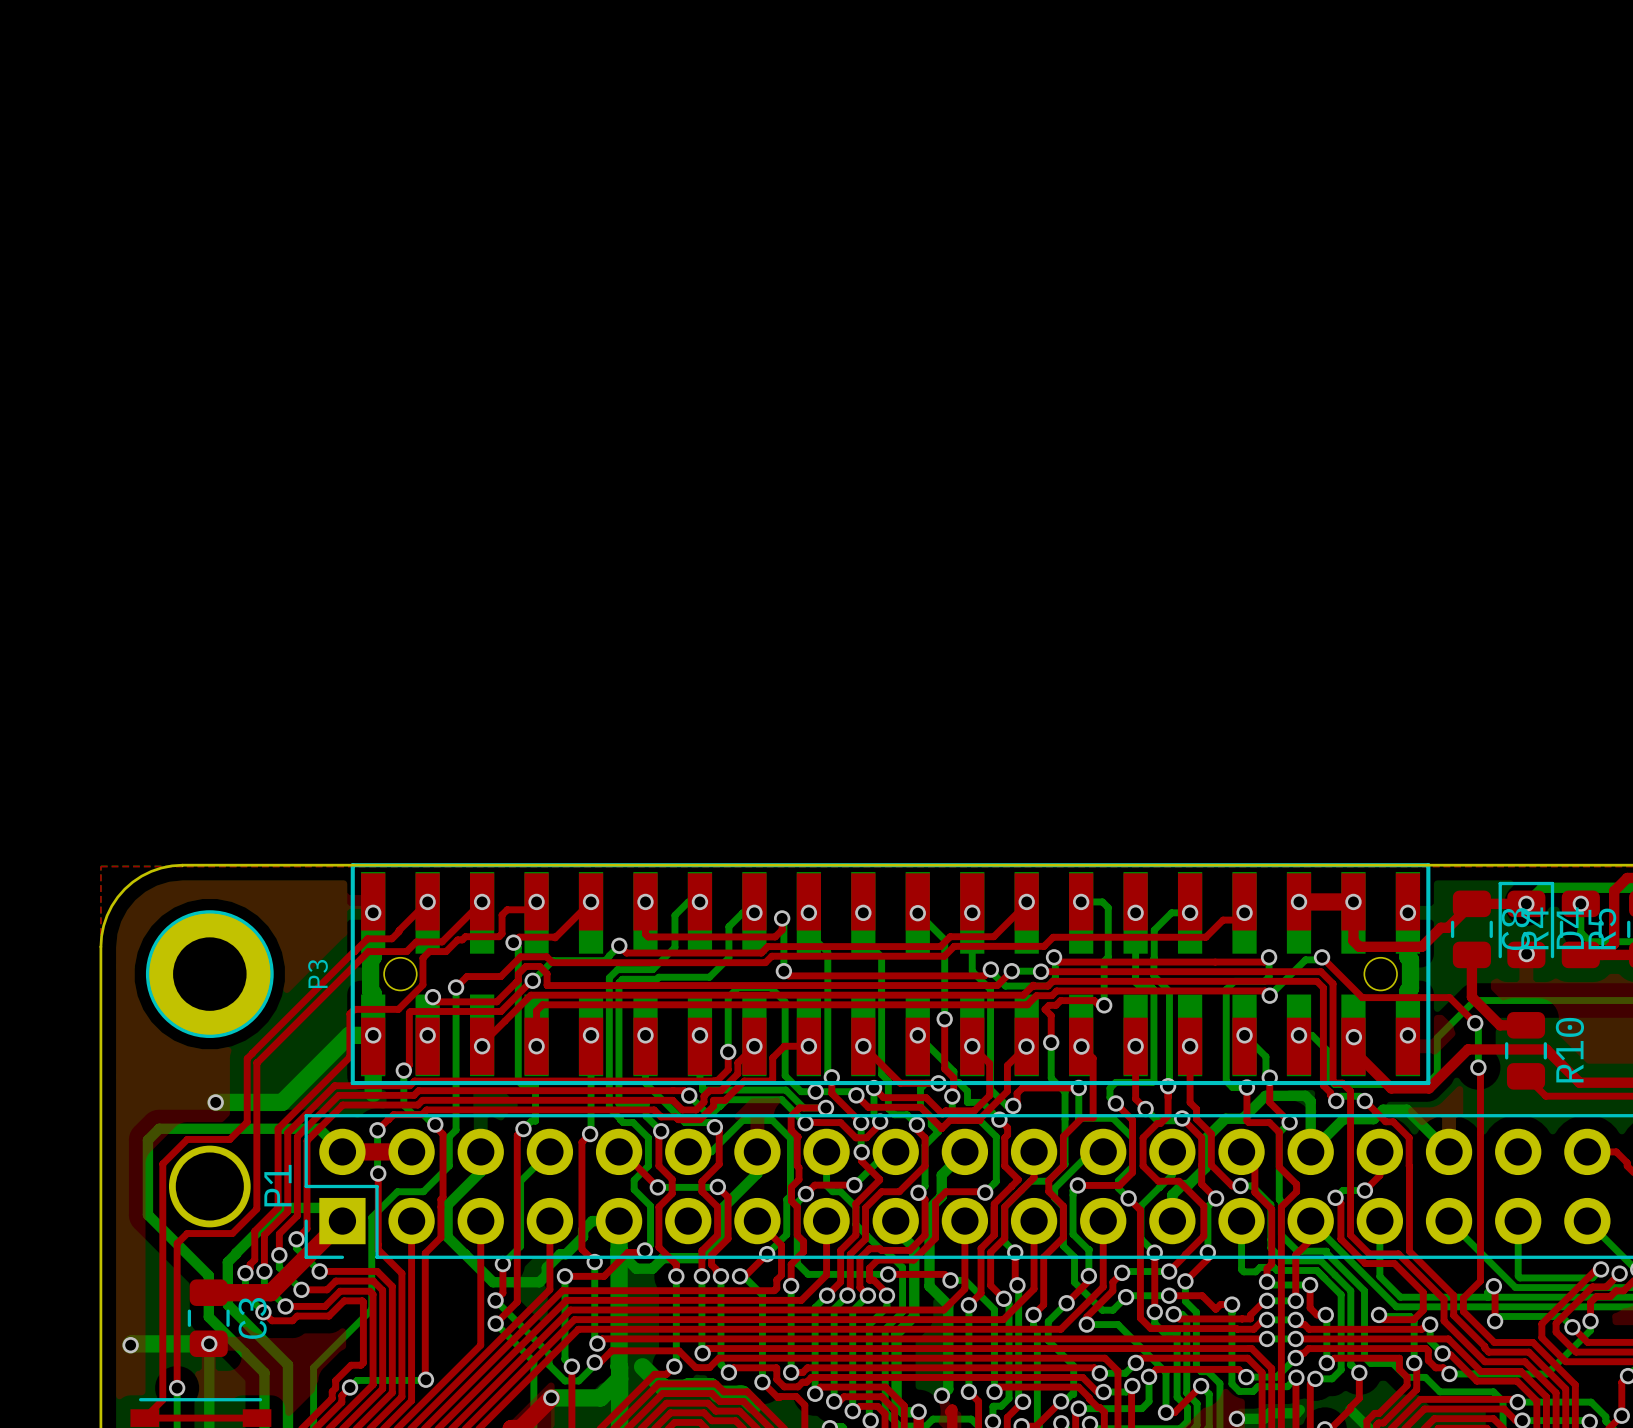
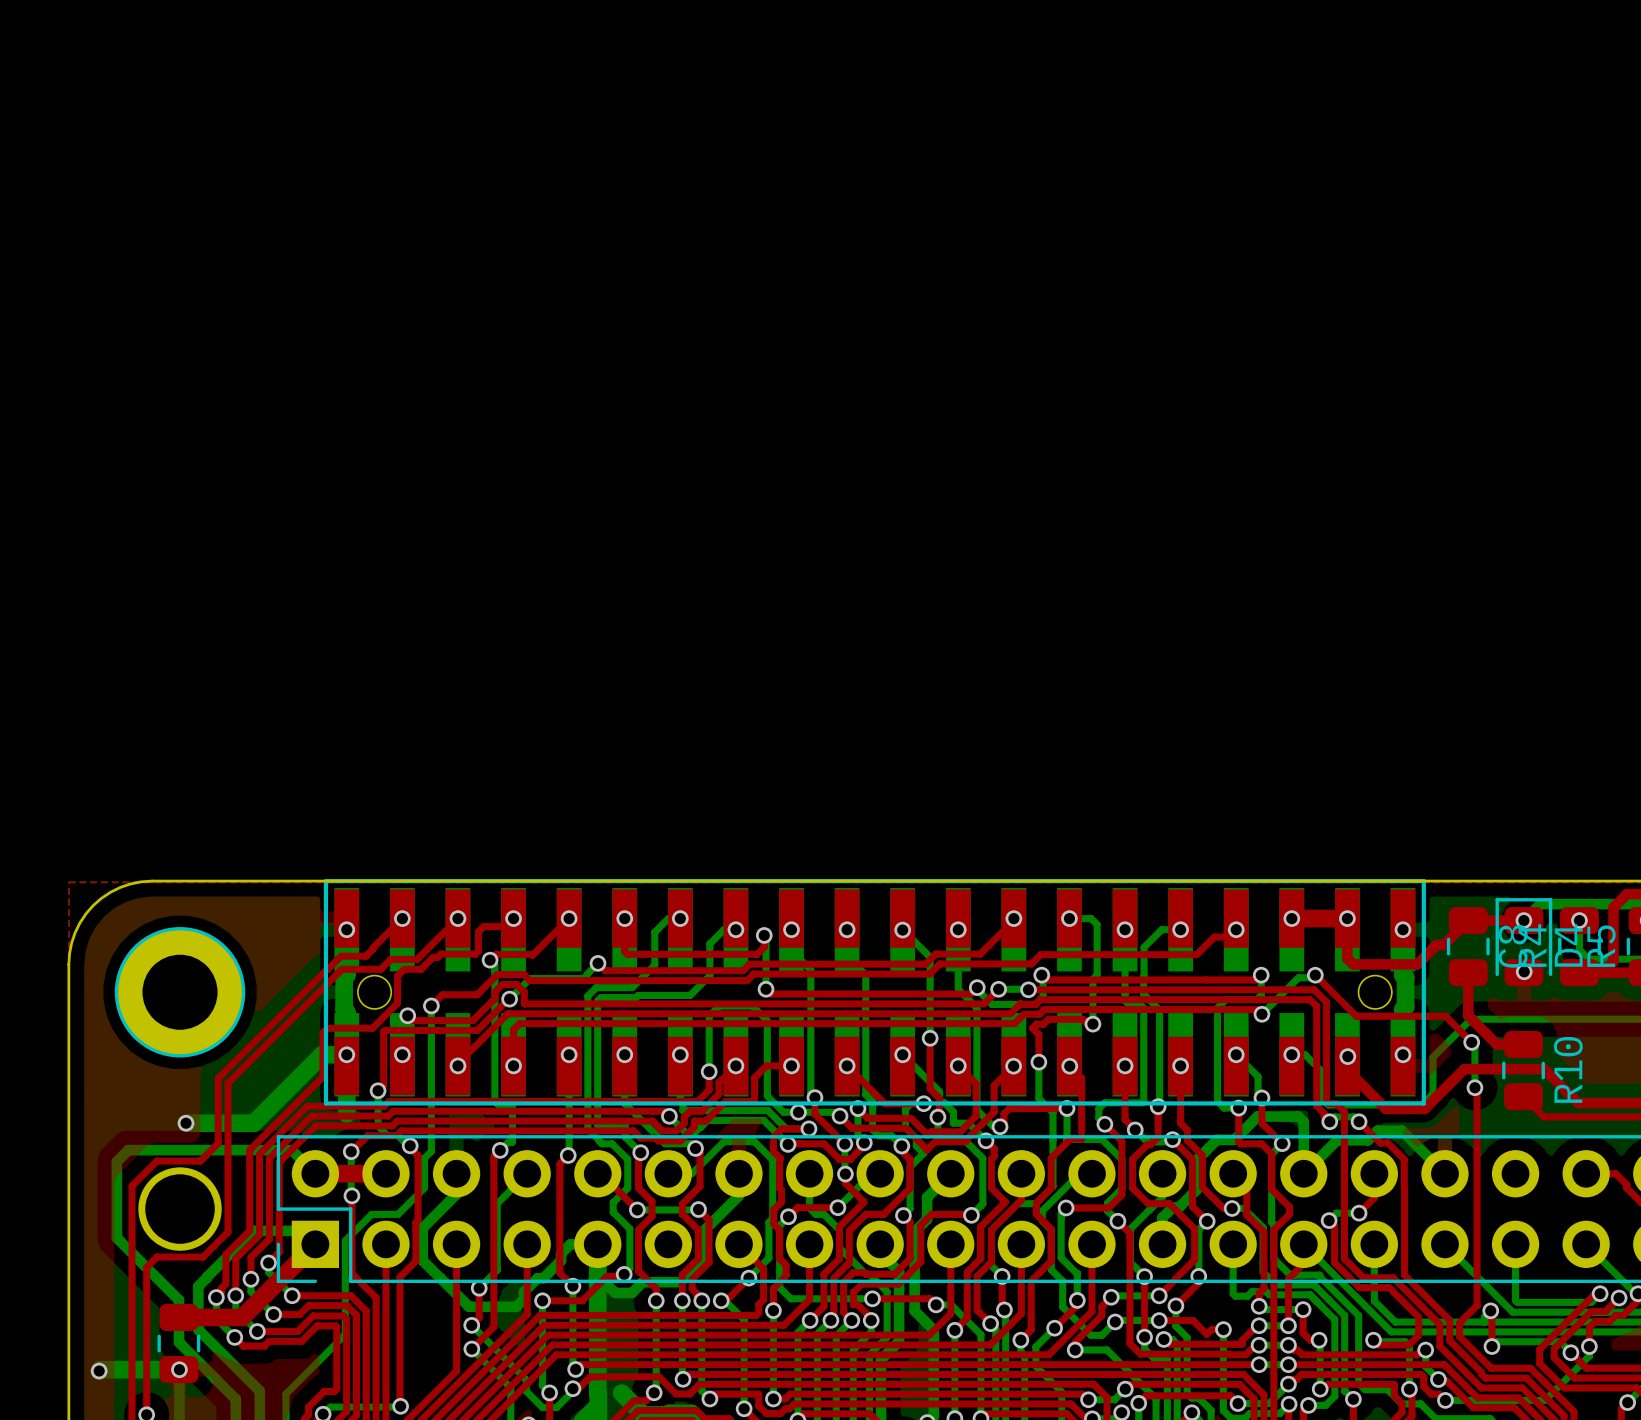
P3 name: P3 (318, 974) -> none
P1 name: P1 (277, 1185) -> none
C3 name: C3 (252, 1318) -> none

